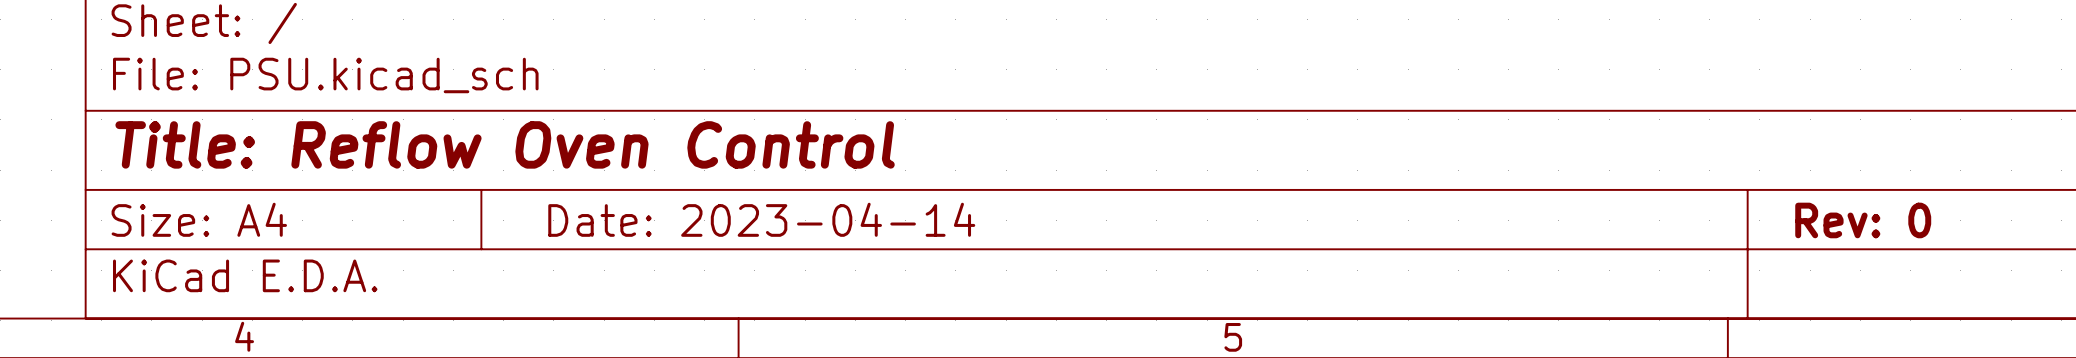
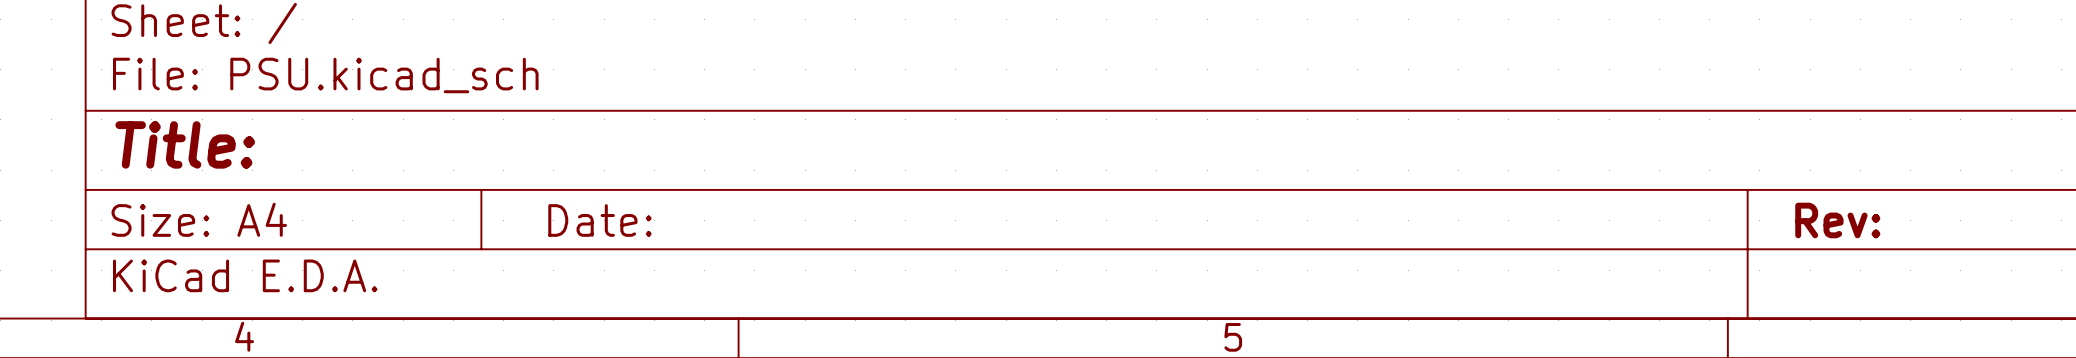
title block: Title: Reflow Oven Control (505, 144) -> Title: (185, 144)
title block: Date: 2023-04-14 (761, 219) -> Date: (599, 220)
title block: Rev: 0 (1863, 220) -> Rev: (1837, 220)

